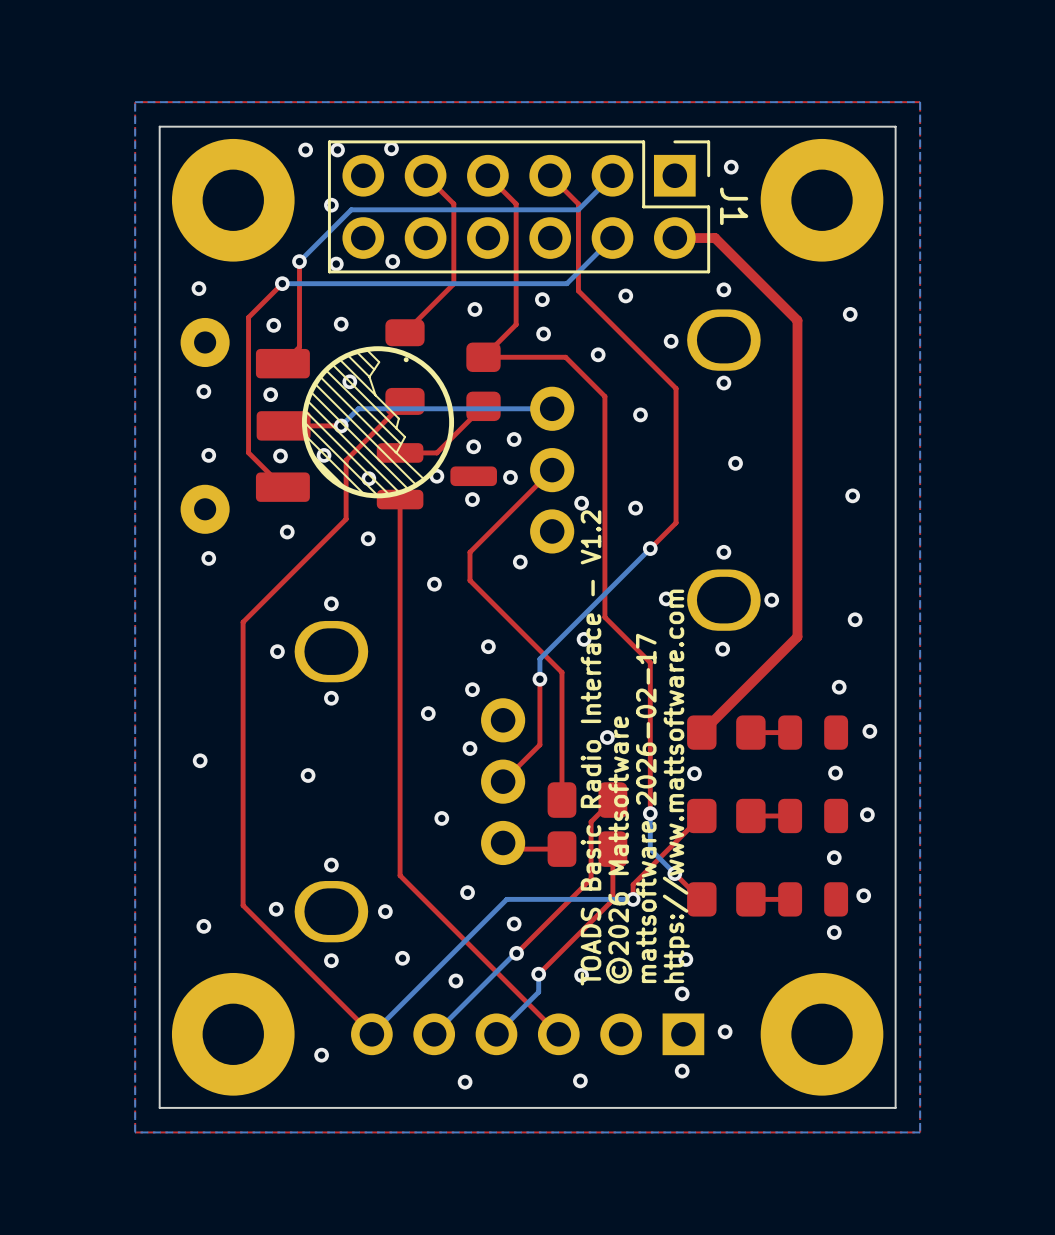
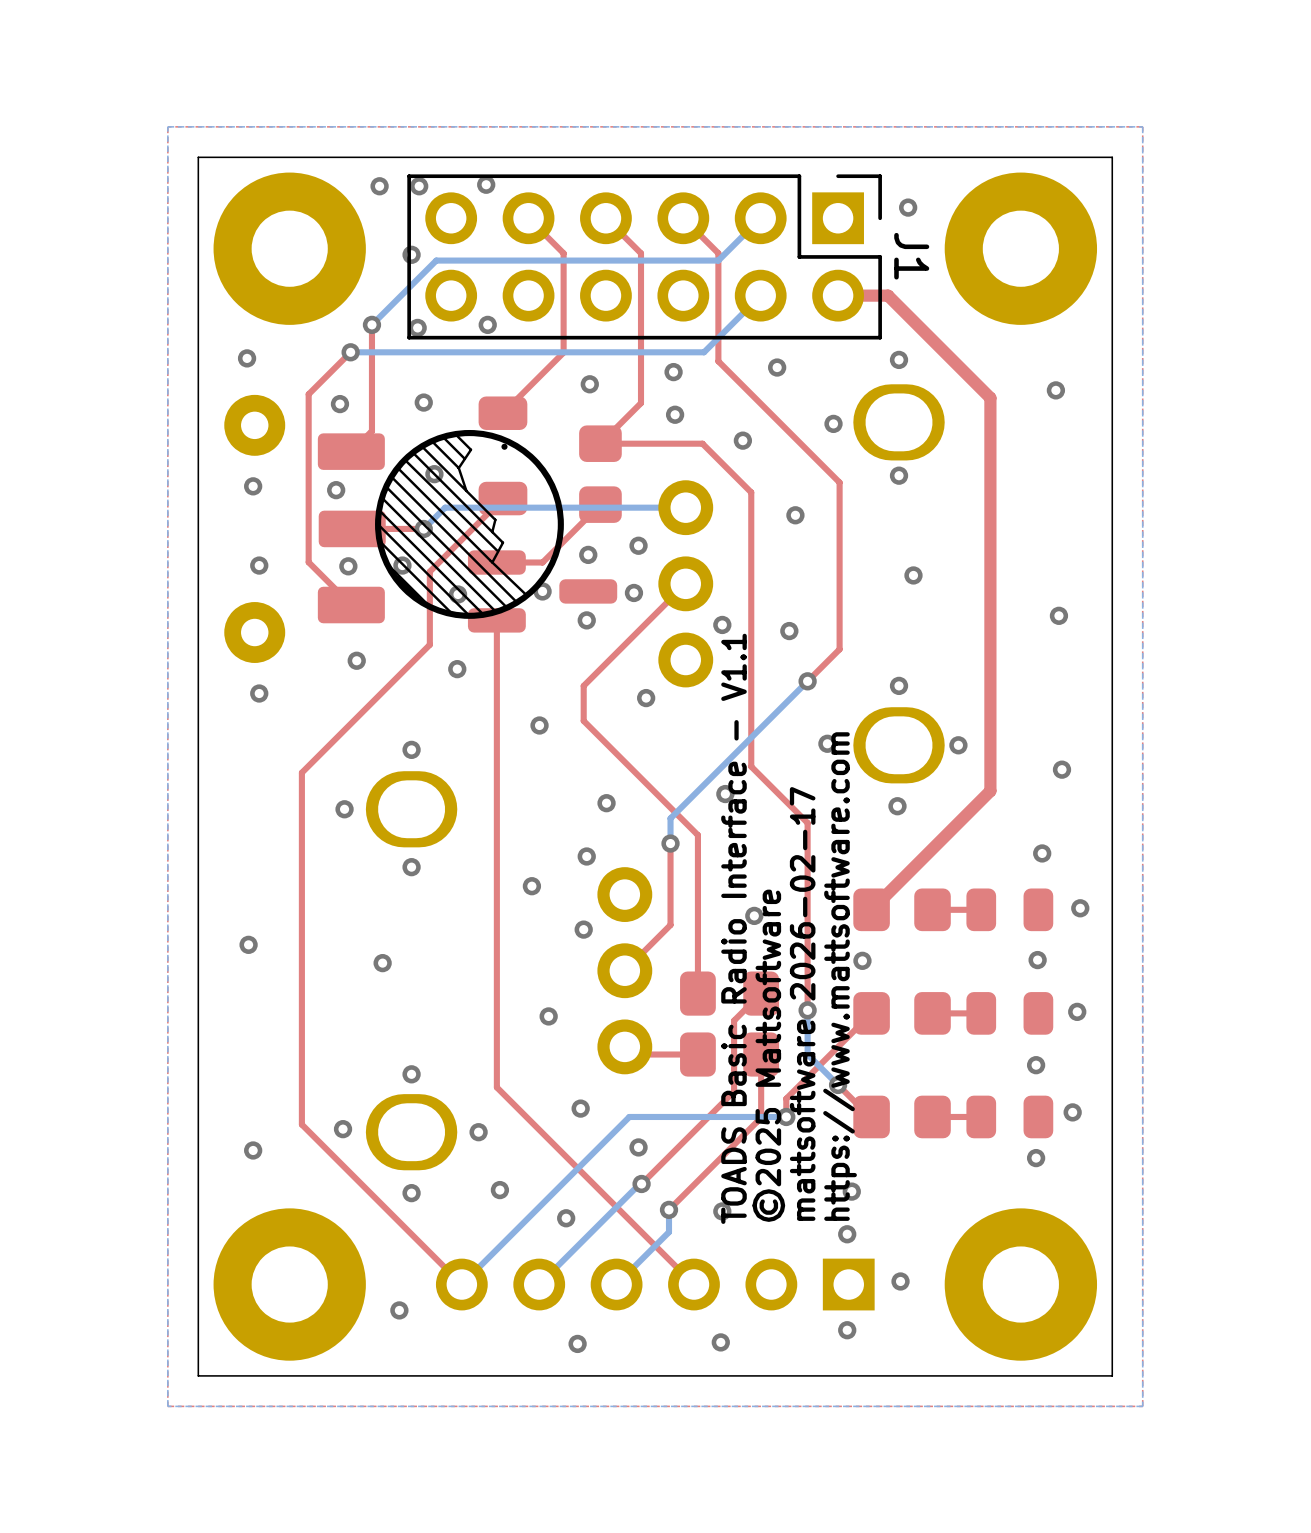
text: TOADS Basic Radio Interface - V1.2 (591, 747) -> TOADS Basic Radio Interface - V1.1 (733, 928)
text: ©2026 Mattsoftware (619, 850) -> ©2025 Mattsoftware (768, 1055)

